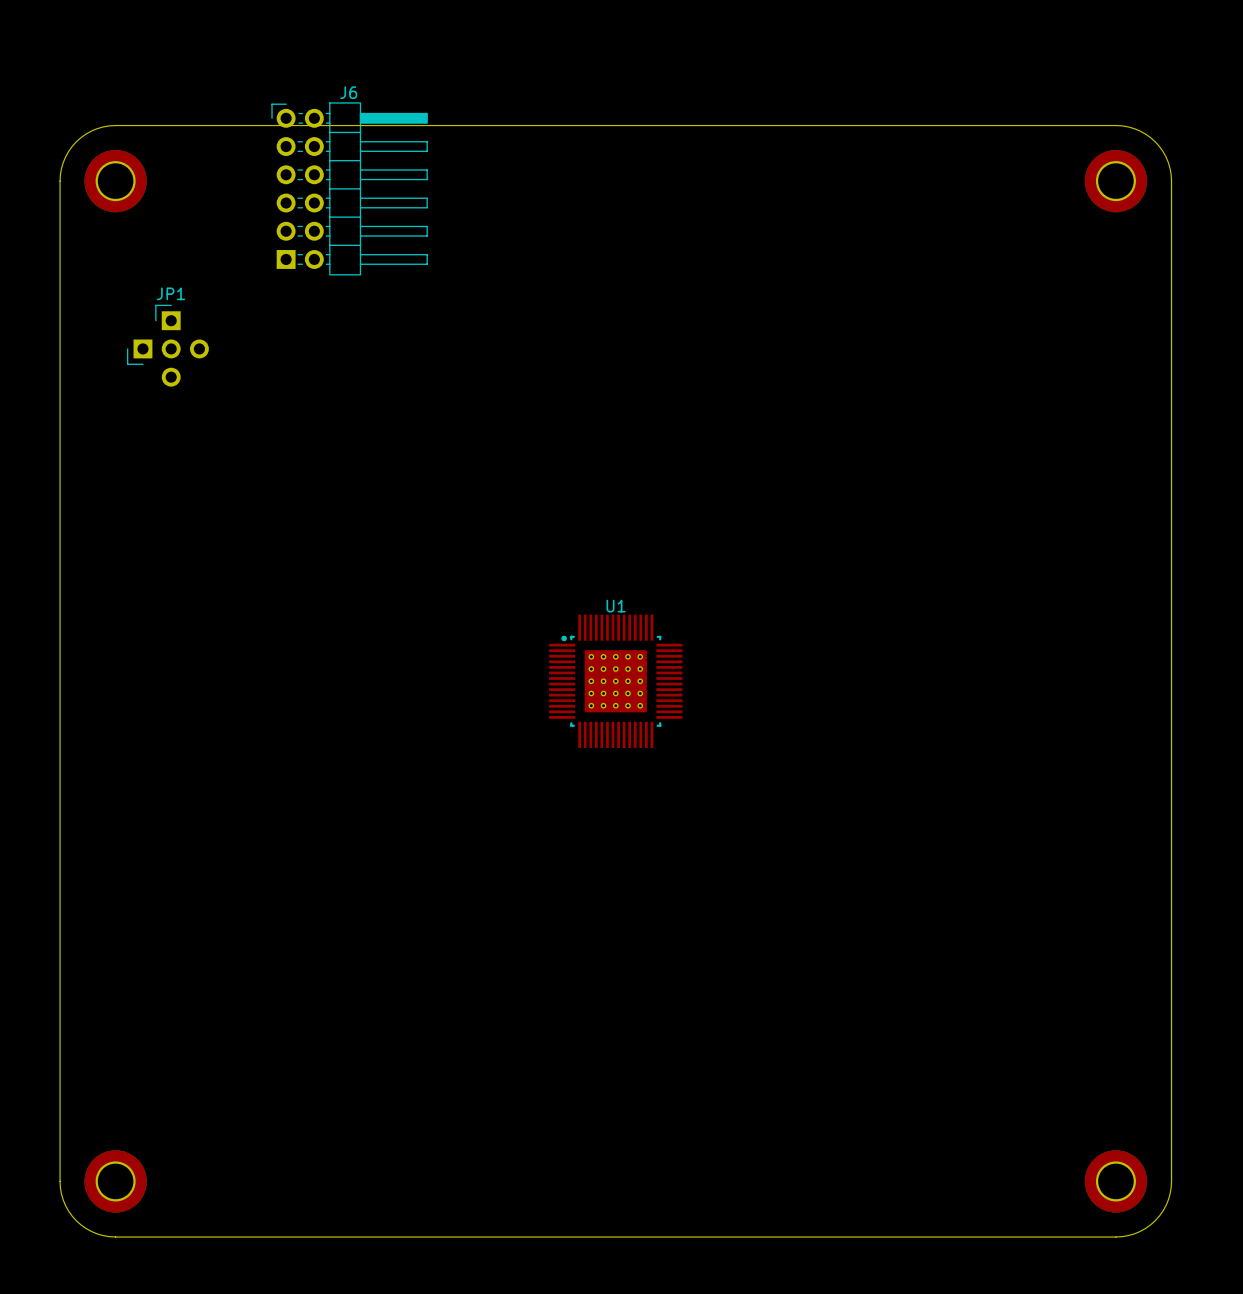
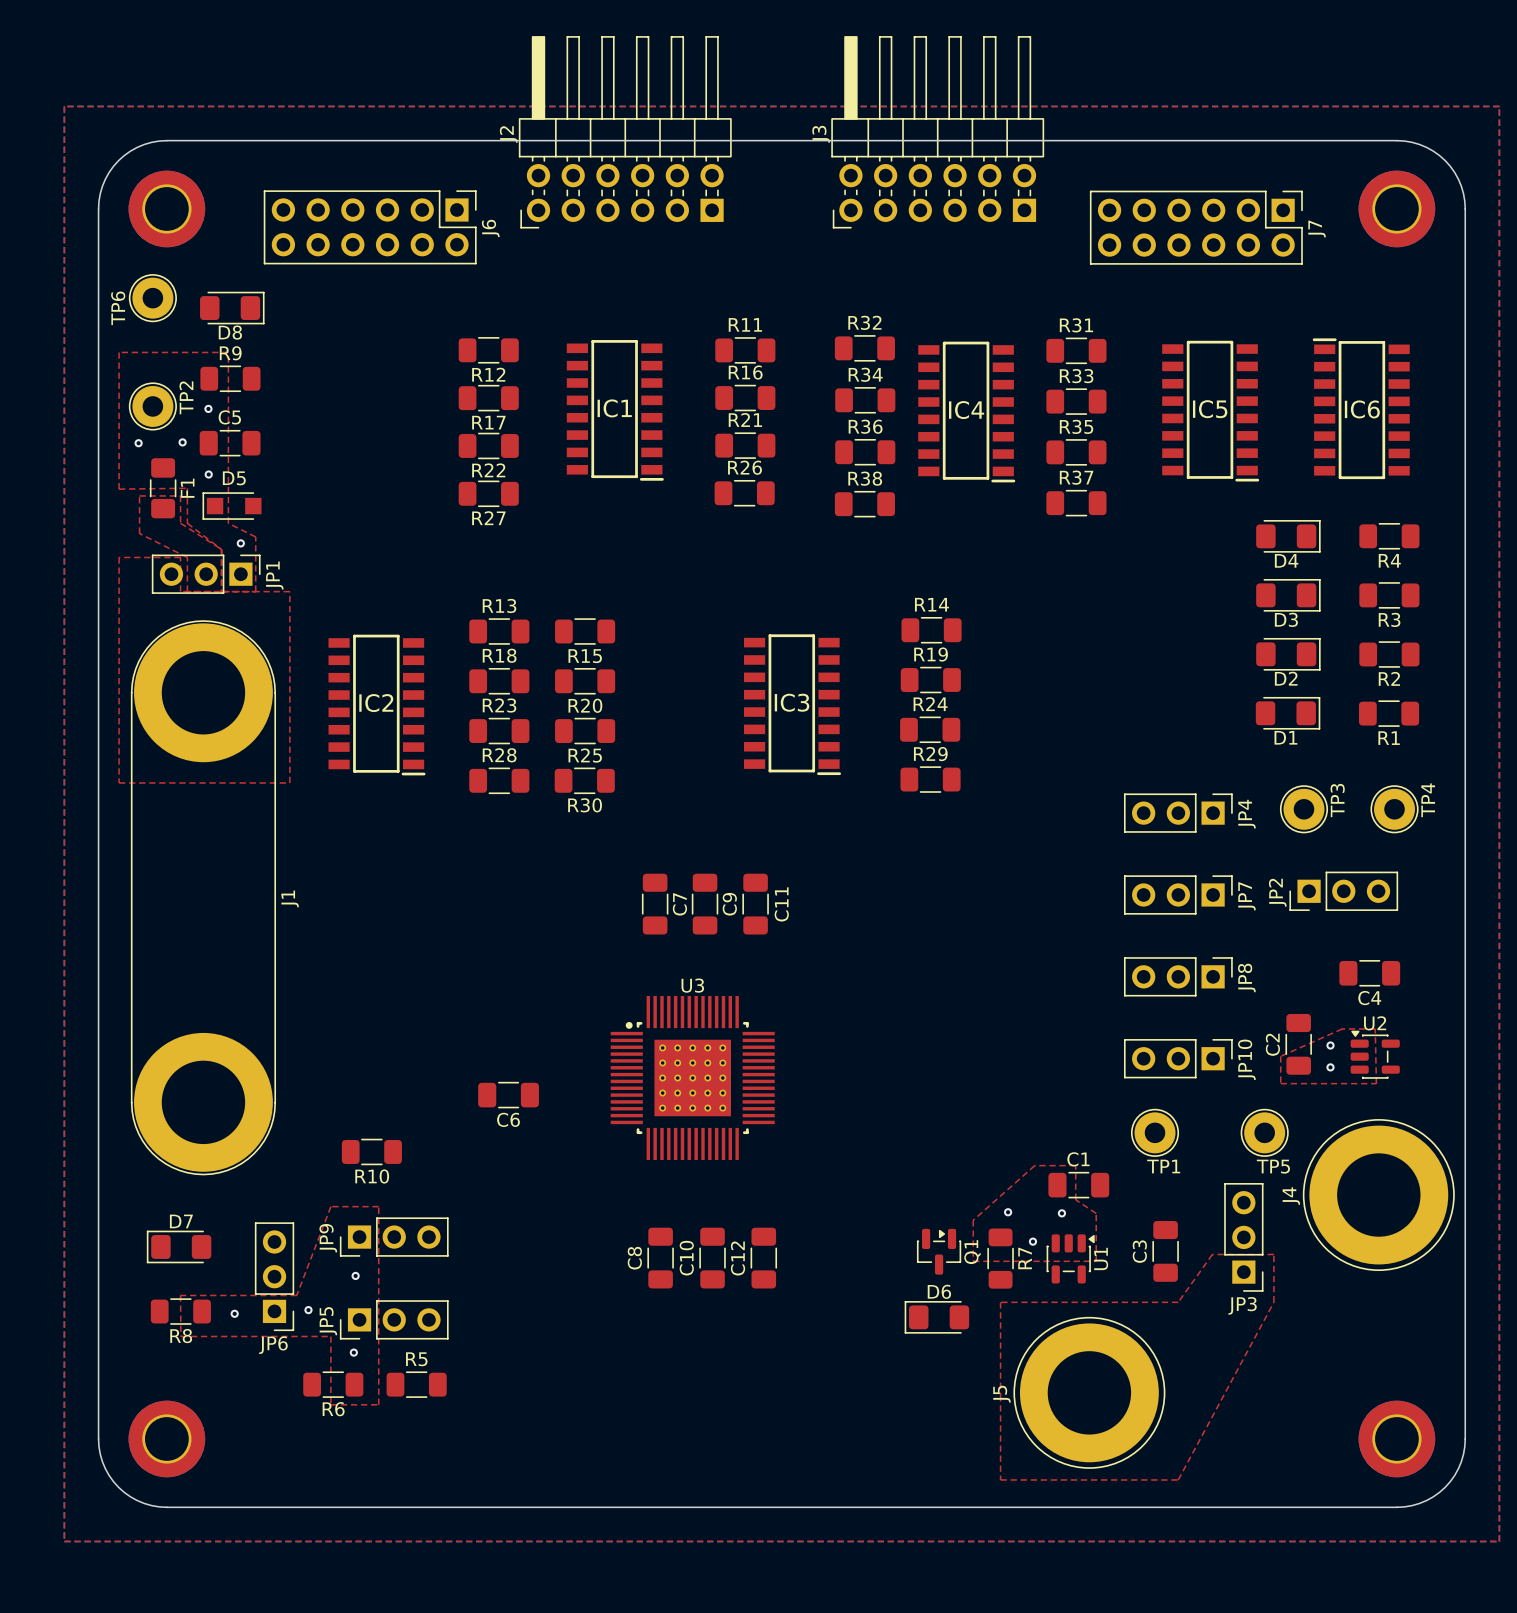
J6 name position: J6 (348, 92) -> J6 (490, 228)
top zone outline: none -> (64, 106) (64, 1541) (1499, 1541) (1499, 106) (64, 106)
J6 footprint: [271, 102, 428, 276] -> [263, 190, 477, 265]
J2: none -> (625, 132)
J3: none -> (937, 132)
J7: none -> (1196, 227)
TP6: none -> (152, 298)
D8: none -> (232, 308)
JP1 name position: JP1 (170, 293) -> JP1 (274, 575)
R32: none -> (864, 348)
R12: none -> (488, 350)
R11: none -> (745, 350)
R31: none -> (1076, 350)
JP1 footprint: [126, 304, 209, 387] -> [151, 554, 261, 594]
R9: none -> (230, 378)
R17: none -> (488, 398)
R16: none -> (745, 398)
R34: none -> (865, 400)
R33: none -> (1076, 401)
TP2: none -> (152, 406)
via: none -> (208, 408)
IC6: none -> (1361, 408)
IC1: none -> (615, 410)
IC5: none -> (1210, 411)
IC4: none -> (966, 412)
via: none -> (182, 442)
via: none -> (138, 443)
C5: none -> (230, 443)
R22: none -> (488, 445)
R21: none -> (745, 445)
R36: none -> (865, 452)
R35: none -> (1076, 452)
via: none -> (208, 474)
F1: none -> (163, 488)
R27: none -> (488, 493)
R26: none -> (744, 493)
R37: none -> (1076, 503)
R38: none -> (864, 504)
D5: none -> (232, 506)
D4: none -> (1288, 536)
R4: none -> (1389, 536)
via: none -> (240, 543)
top zone outline: none -> (221, 549) (187, 523) (187, 488) (119, 489) (119, 352) (228, 352) (228, 523) (255, 536) (255, 591)
top zone outline: none -> (221, 549) (221, 591)
top zone outline: none -> (221, 549) (180, 523) (180, 495) (139, 495) (139, 533) (187, 557) (187, 591)
top zone outline: none -> (119, 557) (119, 782) (289, 782) (289, 591) (180, 591) (180, 557) (119, 557)
D3: none -> (1288, 595)
R3: none -> (1389, 595)
R14: none -> (931, 630)
R13: none -> (499, 631)
R15: none -> (585, 631)
D2: none -> (1288, 654)
R2: none -> (1389, 654)
R19: none -> (930, 680)
R18: none -> (499, 681)
R20: none -> (585, 681)
IC2: none -> (377, 705)
IC3: none -> (792, 704)
D1: none -> (1288, 713)
R1: none -> (1389, 713)
R24: none -> (930, 729)
R23: none -> (499, 731)
R25: none -> (585, 731)
U1 name position: U1 (616, 606) -> U1 (1101, 1258)
U1 footprint: [549, 614, 683, 748] -> [1046, 1234, 1095, 1284]
R29: none -> (930, 779)
R28: none -> (499, 780)
R30: none -> (584, 780)
TP3: none -> (1303, 809)
TP4: none -> (1394, 809)
JP4: none -> (1178, 813)
JP2: none -> (1343, 891)
JP7: none -> (1178, 894)
J1: none -> (203, 897)
C7: none -> (655, 904)
C9: none -> (705, 904)
C11: none -> (755, 904)
C4: none -> (1369, 973)
JP8: none -> (1178, 976)
top zone outline: none -> (1342, 1028) (1375, 1028) (1376, 1083) (1280, 1083) (1280, 1056) (1342, 1028)
C2: none -> (1298, 1044)
via: none -> (1330, 1045)
U2: none -> (1375, 1054)
JP10: none -> (1178, 1058)
via: none -> (1330, 1067)
U3: none -> (692, 1078)
C6: none -> (508, 1095)
TP1: none -> (1155, 1132)
TP5: none -> (1264, 1132)
R10: none -> (371, 1151)
top zone outline: none -> (1034, 1165) (1075, 1165) (1075, 1199) (1096, 1213) (1096, 1261) (973, 1261) (973, 1220) (1034, 1165)
C1: none -> (1078, 1185)
J4: none -> (1378, 1195)
top zone outline: none -> (330, 1206) (378, 1206) (378, 1404) (330, 1404) (330, 1336) (180, 1336) (180, 1295) (296, 1295) (330, 1206)
via: none -> (1008, 1212)
via: none -> (1061, 1213)
JP9: none -> (394, 1237)
JP3: none -> (1243, 1237)
via: none -> (1032, 1241)
D7: none -> (179, 1246)
C3: none -> (1165, 1251)
Q1: none -> (939, 1251)
top zone outline: none -> (1212, 1254) (1273, 1254) (1273, 1302) (1178, 1479) (1000, 1479) (1000, 1302) (1178, 1302) (1212, 1254)
C8: none -> (660, 1258)
C10: none -> (712, 1258)
C12: none -> (763, 1258)
R7: none -> (1000, 1258)
via: none -> (355, 1275)
JP6: none -> (274, 1276)
via: none -> (308, 1310)
R8: none -> (180, 1311)
via: none -> (234, 1313)
D6: none -> (936, 1317)
JP5: none -> (394, 1319)
via: none -> (353, 1352)
R6: none -> (333, 1384)
R5: none -> (416, 1384)
J5: none -> (1089, 1392)

